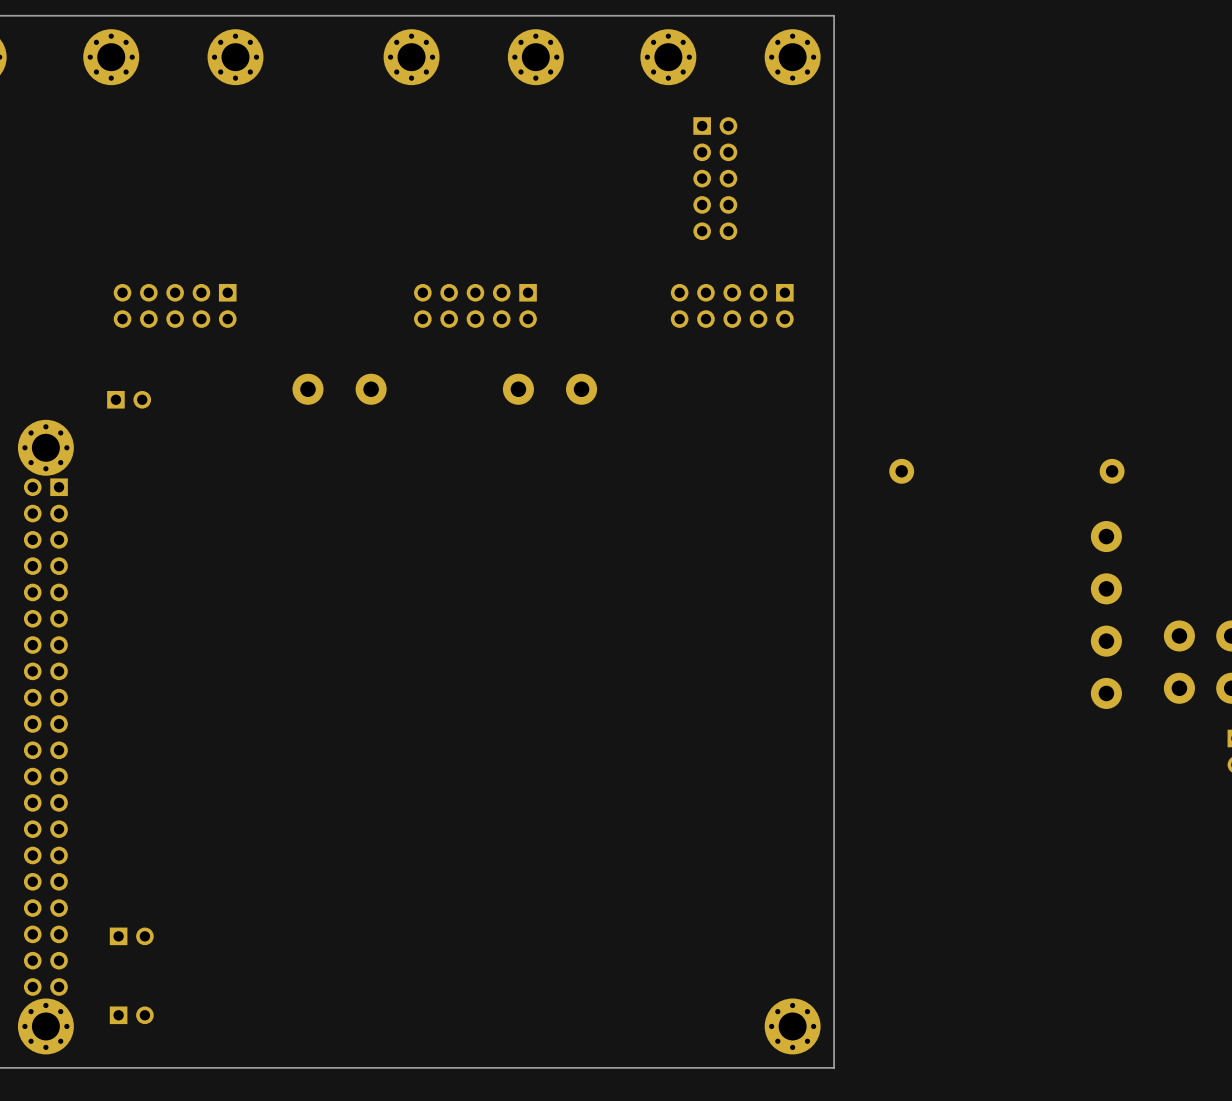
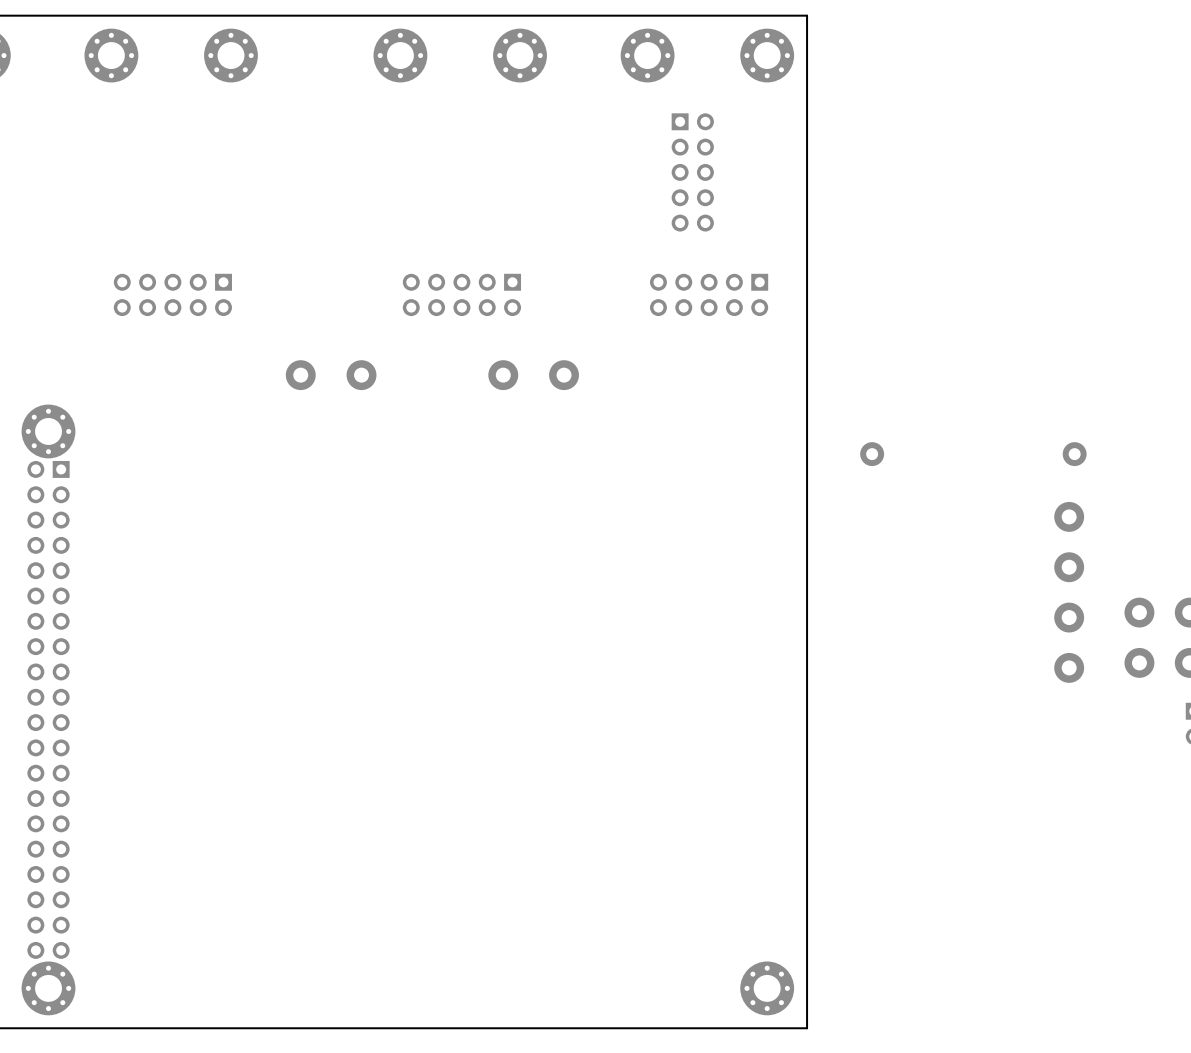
part: (129, 399) -> none
part: (131, 936) -> none
part: (131, 1015) -> none

